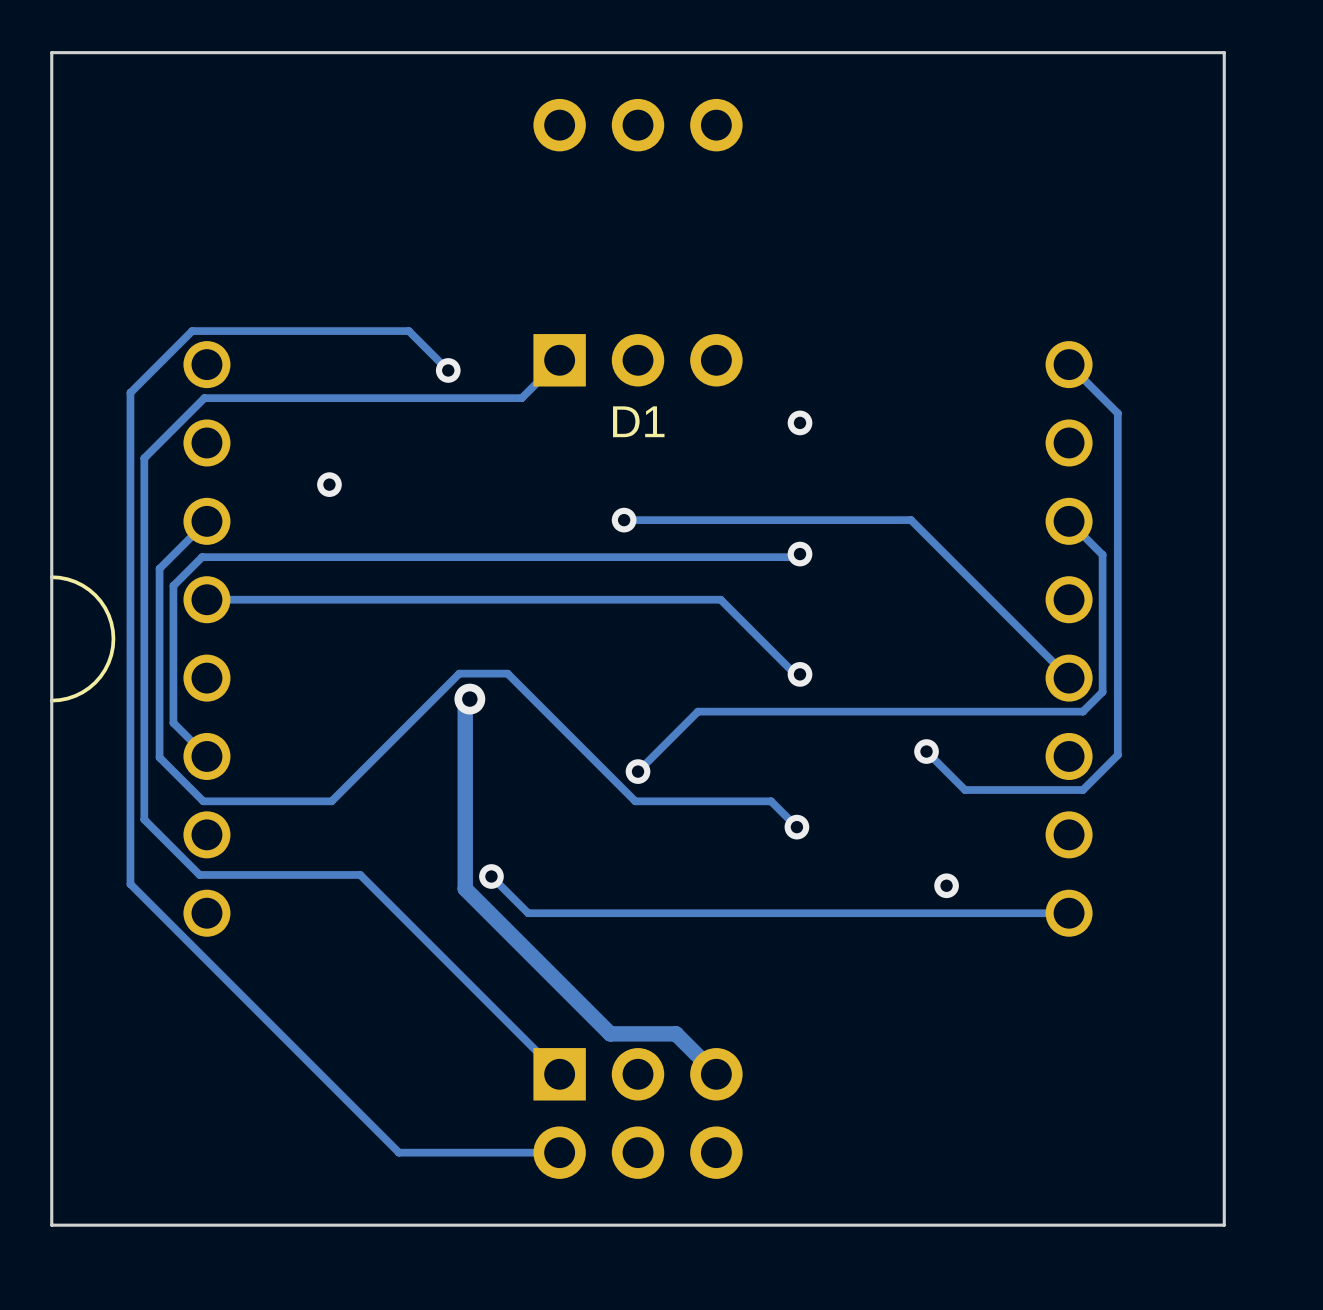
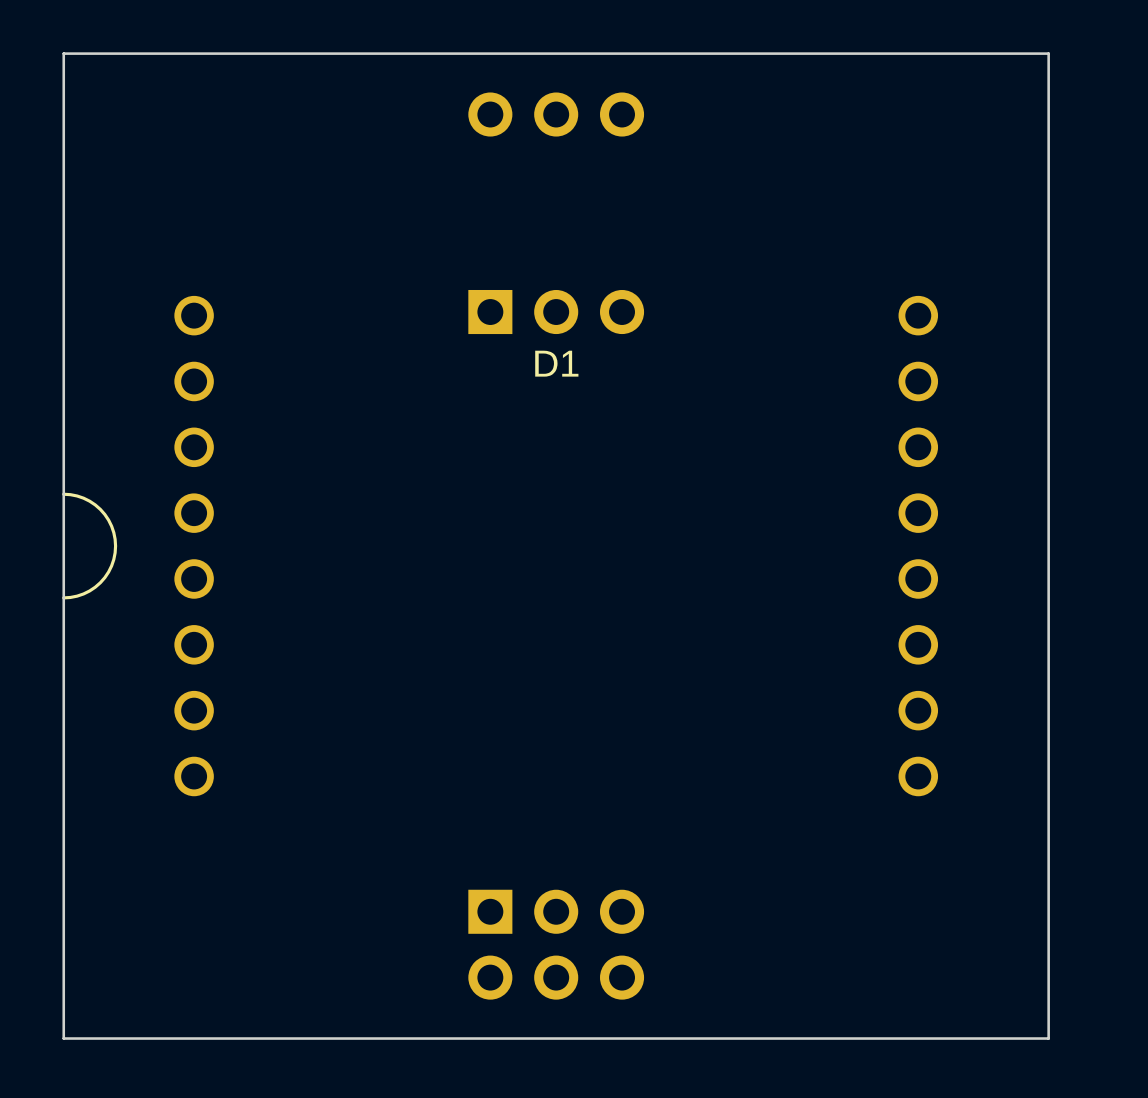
track: (559, 360) (521, 398) (204, 398) (144, 458) (144, 819) (199, 874) (360, 874) (559, 1074) (559, 1070) -> none
track: (1069, 364) (1117, 413) (1117, 755) (1082, 790) (964, 790) (926, 751) -> none
track: (448, 370) (408, 331) (192, 331) (130, 392) (130, 884) (398, 1152) (559, 1152) -> none
via: (448, 370) -> none
via: (800, 422) -> none
via: (329, 484) -> none
track: (624, 520) (911, 520) (1069, 678) -> none
via: (624, 520) -> none
track: (206, 521) (159, 568) (159, 757) (203, 801) (331, 801) (459, 673) (507, 673) (635, 801) (771, 801) (796, 827) -> none
track: (1069, 521) (1102, 554) (1102, 691) (1082, 711) (697, 711) (638, 771) -> none
track: (800, 554) (796, 557) (202, 557) (173, 585) (173, 722) (206, 756) -> none
via: (800, 554) -> none
track: (206, 599) (720, 599) (795, 674) (800, 674) -> none
via: (800, 674) -> none
track: (469, 699) (465, 703) (465, 888) (610, 1033) (675, 1033) (716, 1074) -> none
via: (469, 699) -> none
via: (926, 751) -> none
via: (638, 771) -> none
via: (796, 827) -> none
track: (491, 876) (528, 913) (1069, 913) -> none
via: (491, 876) -> none
via: (946, 885) -> none

